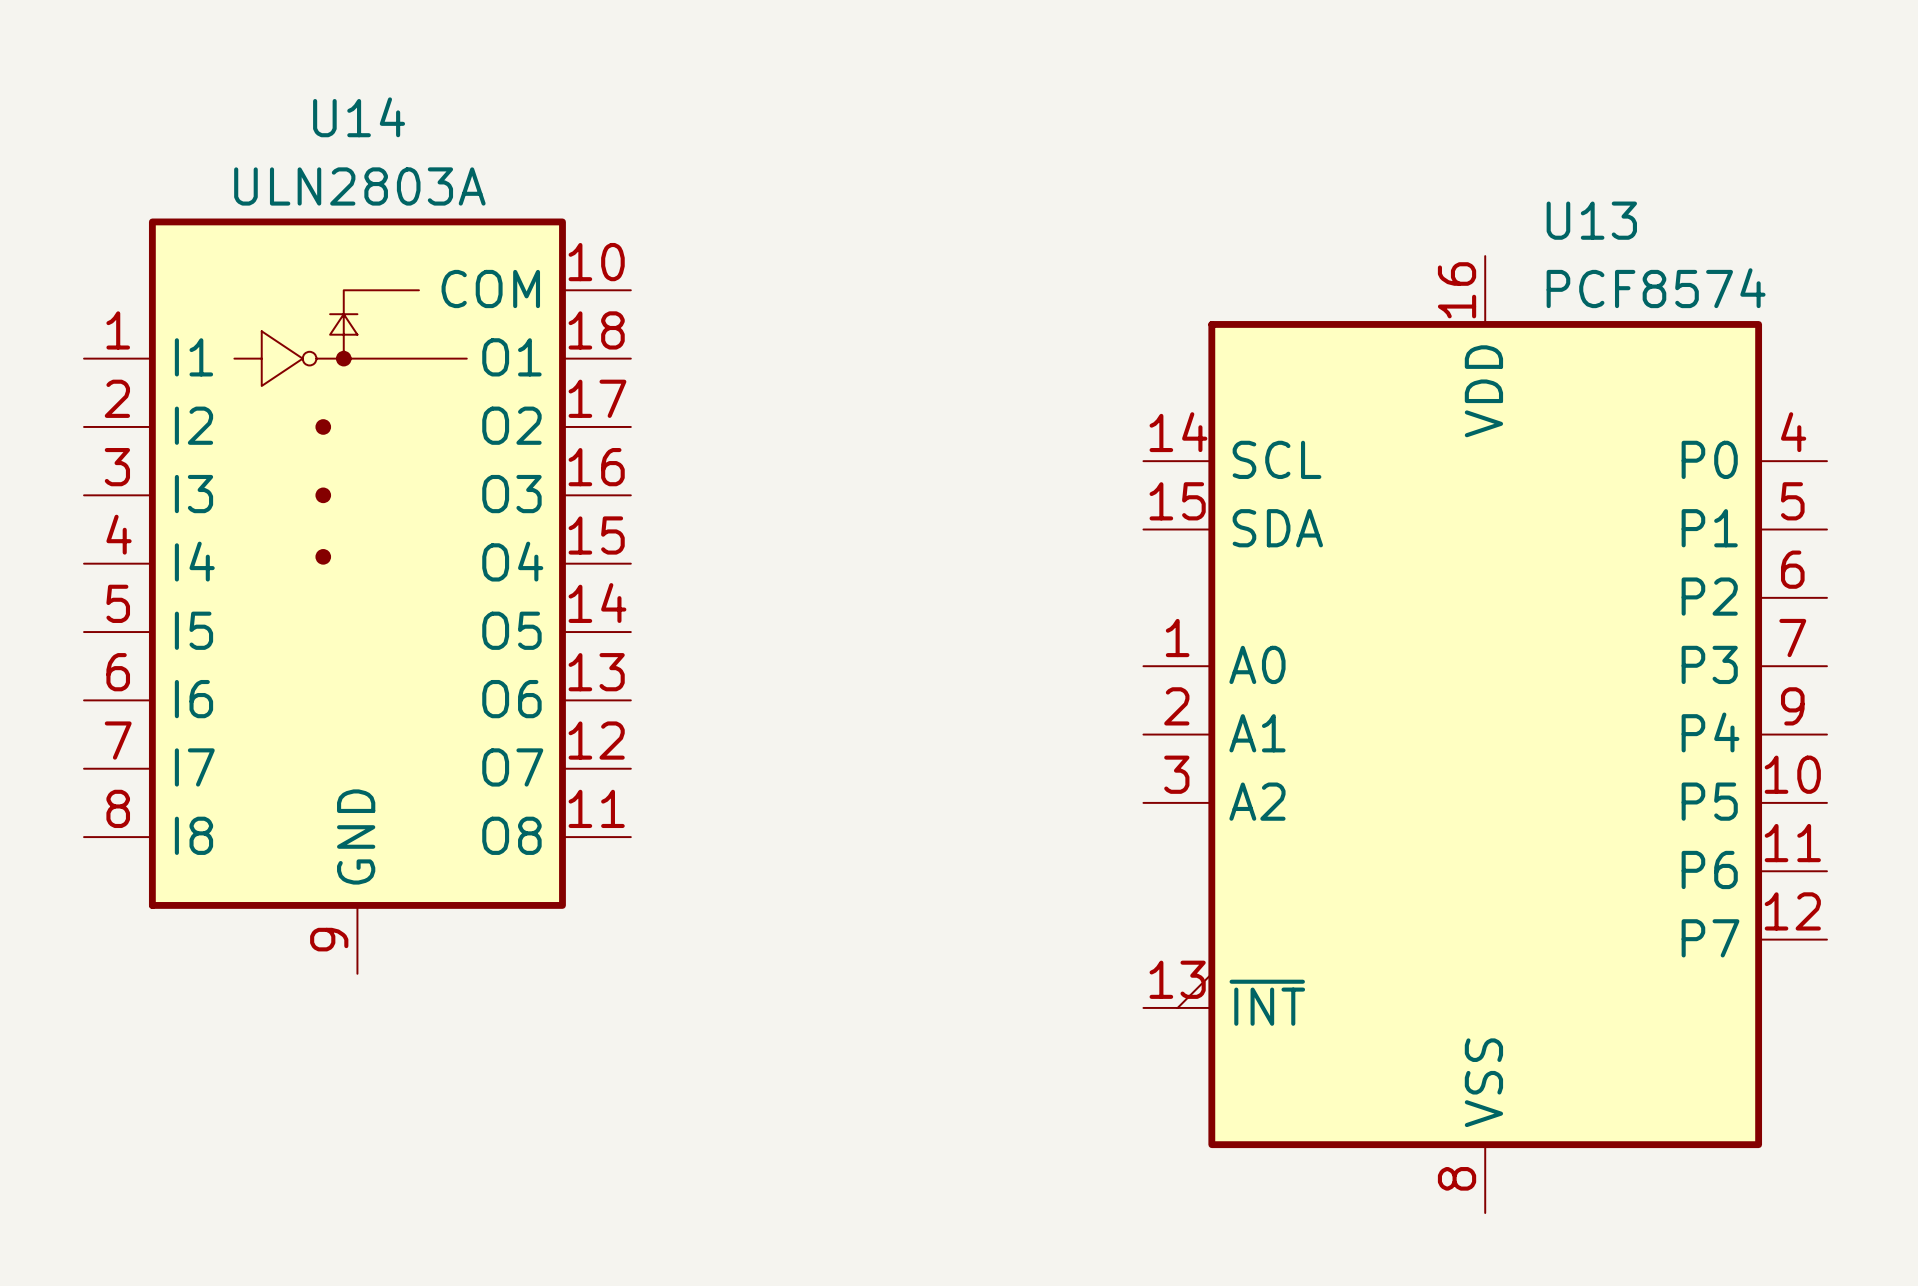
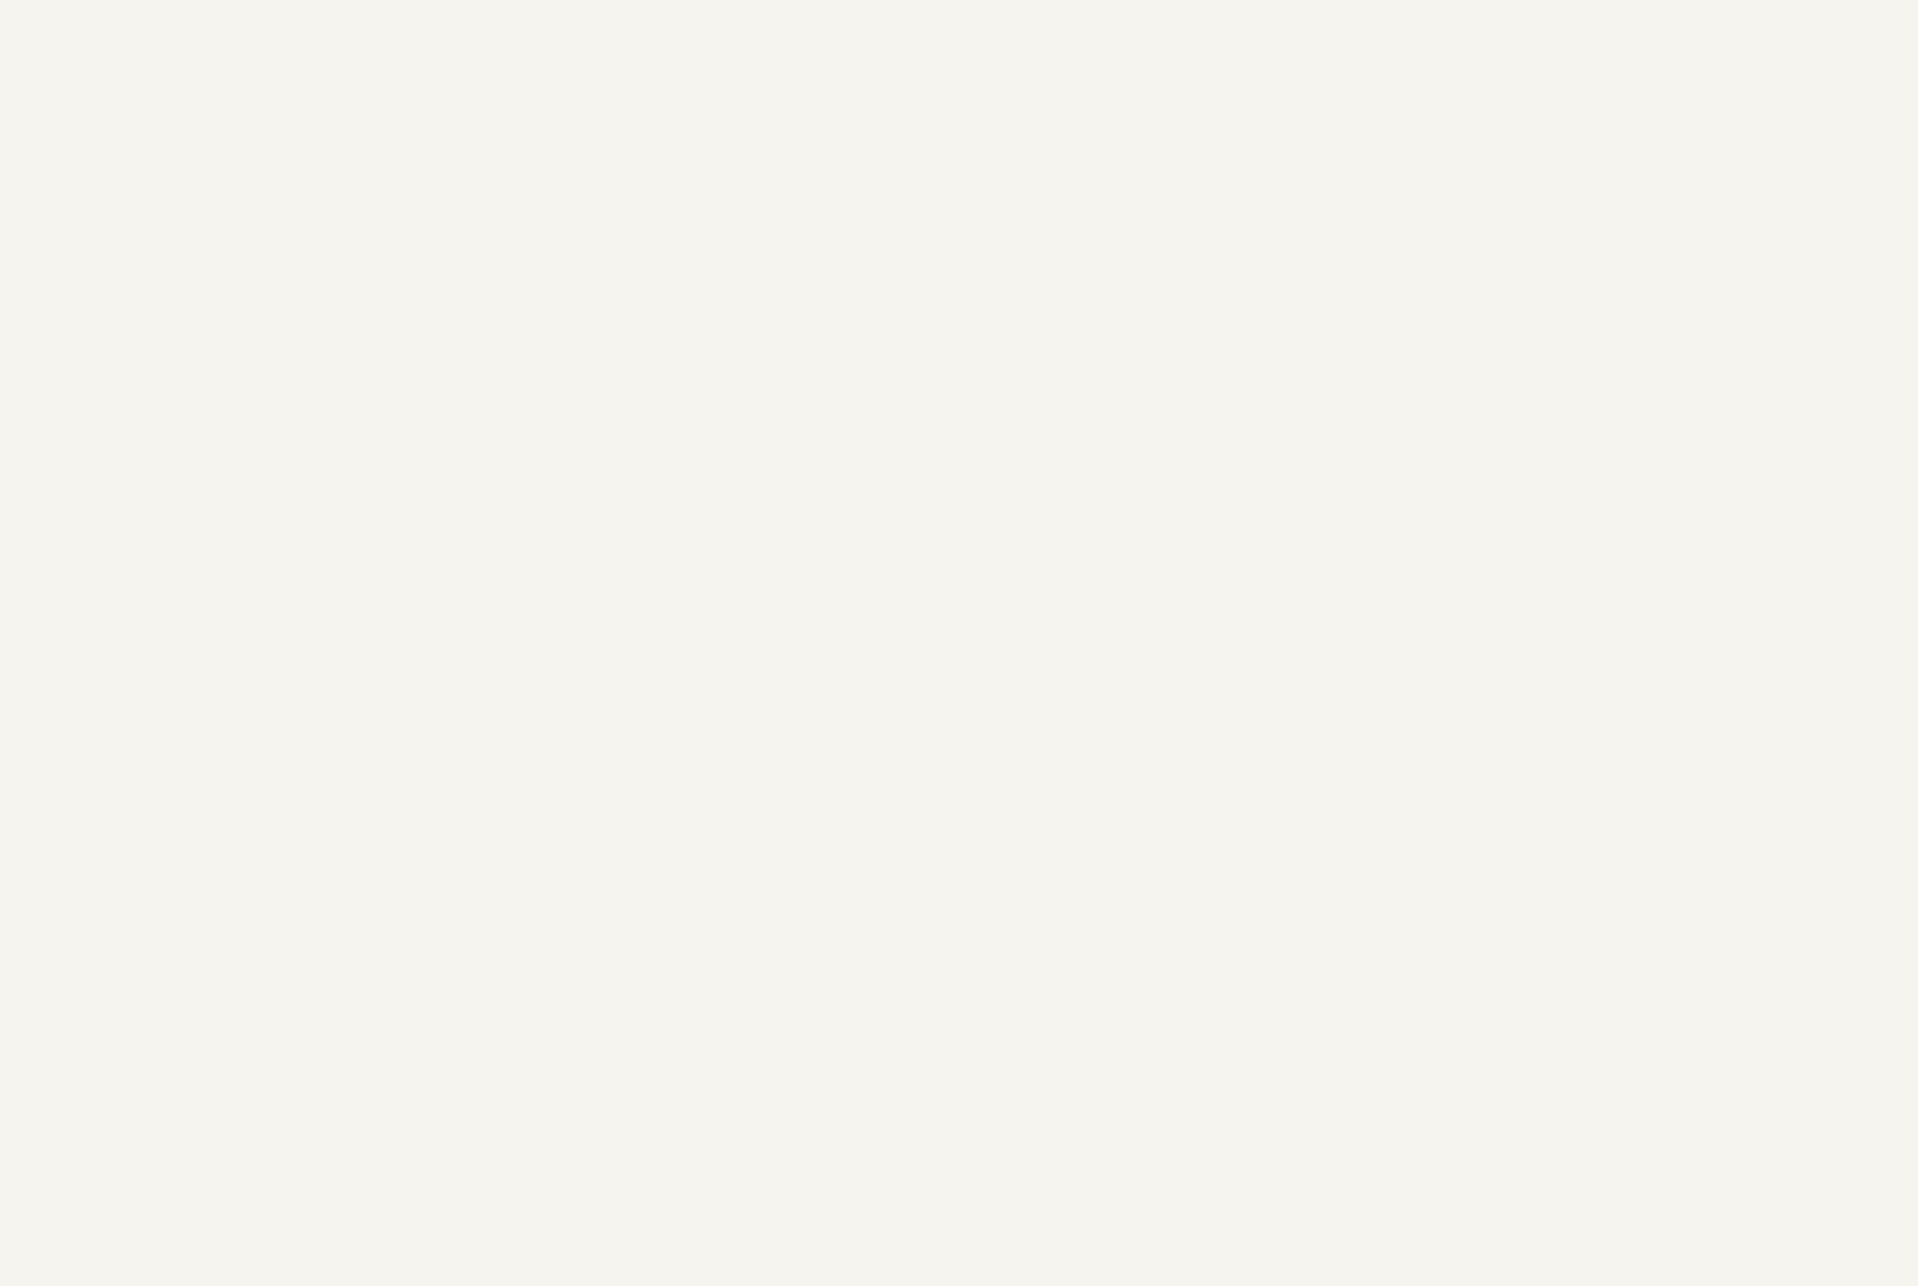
U14: ULN2803A (357, 596) -> none
U13: PCF8574 (1485, 734) -> none

